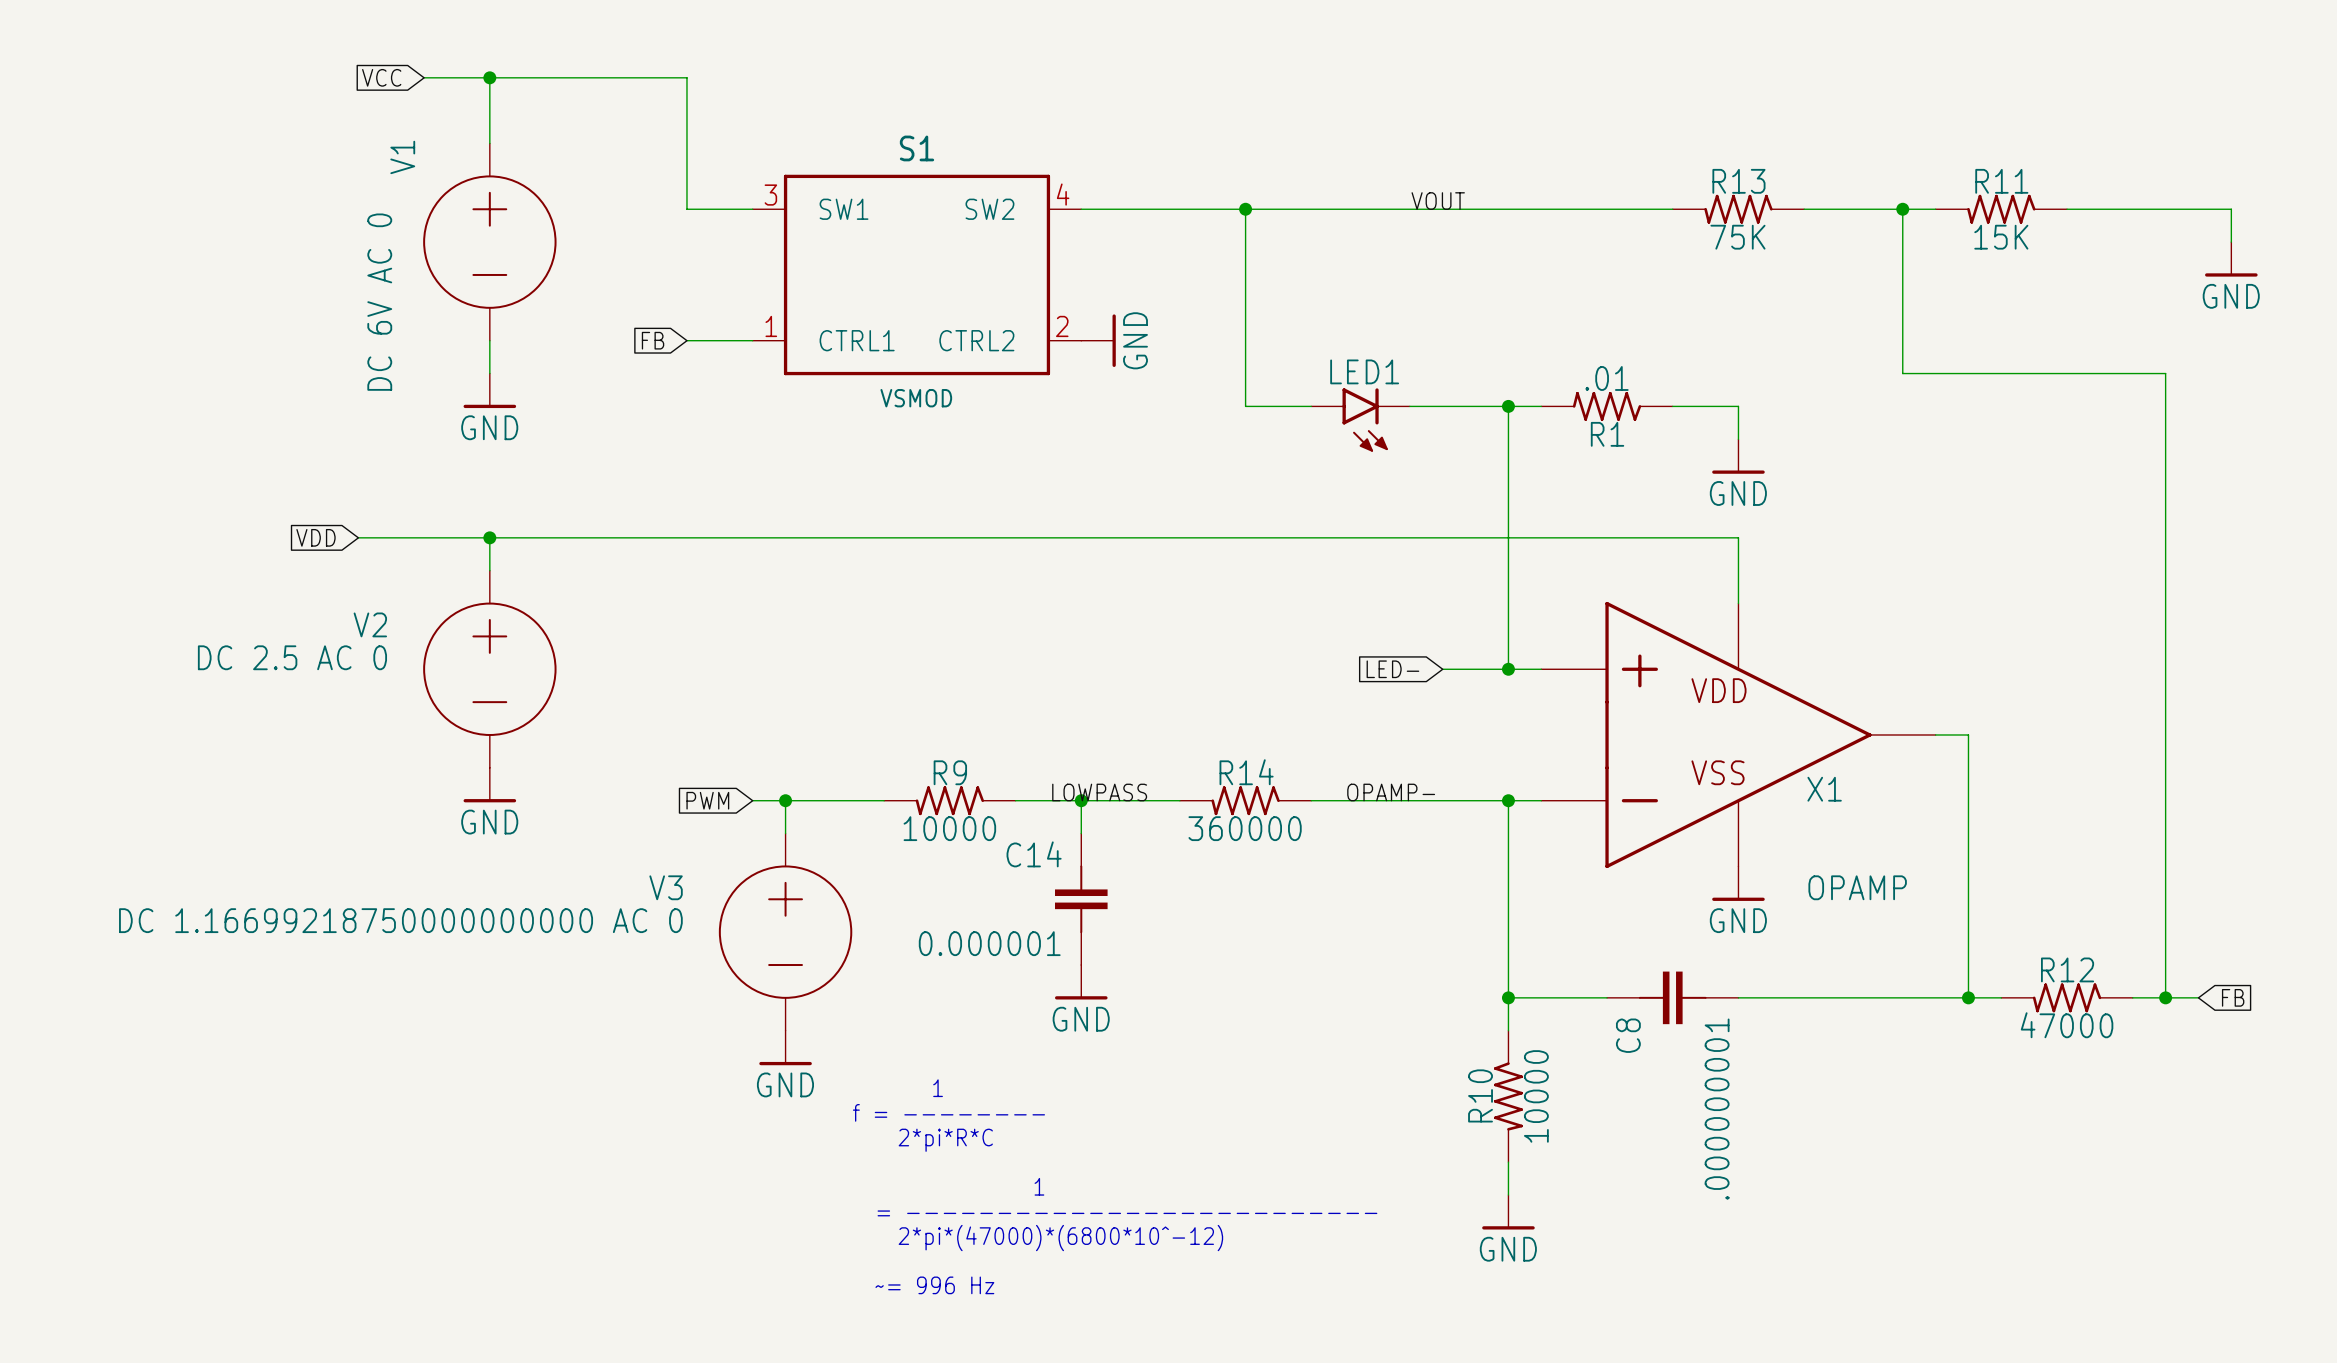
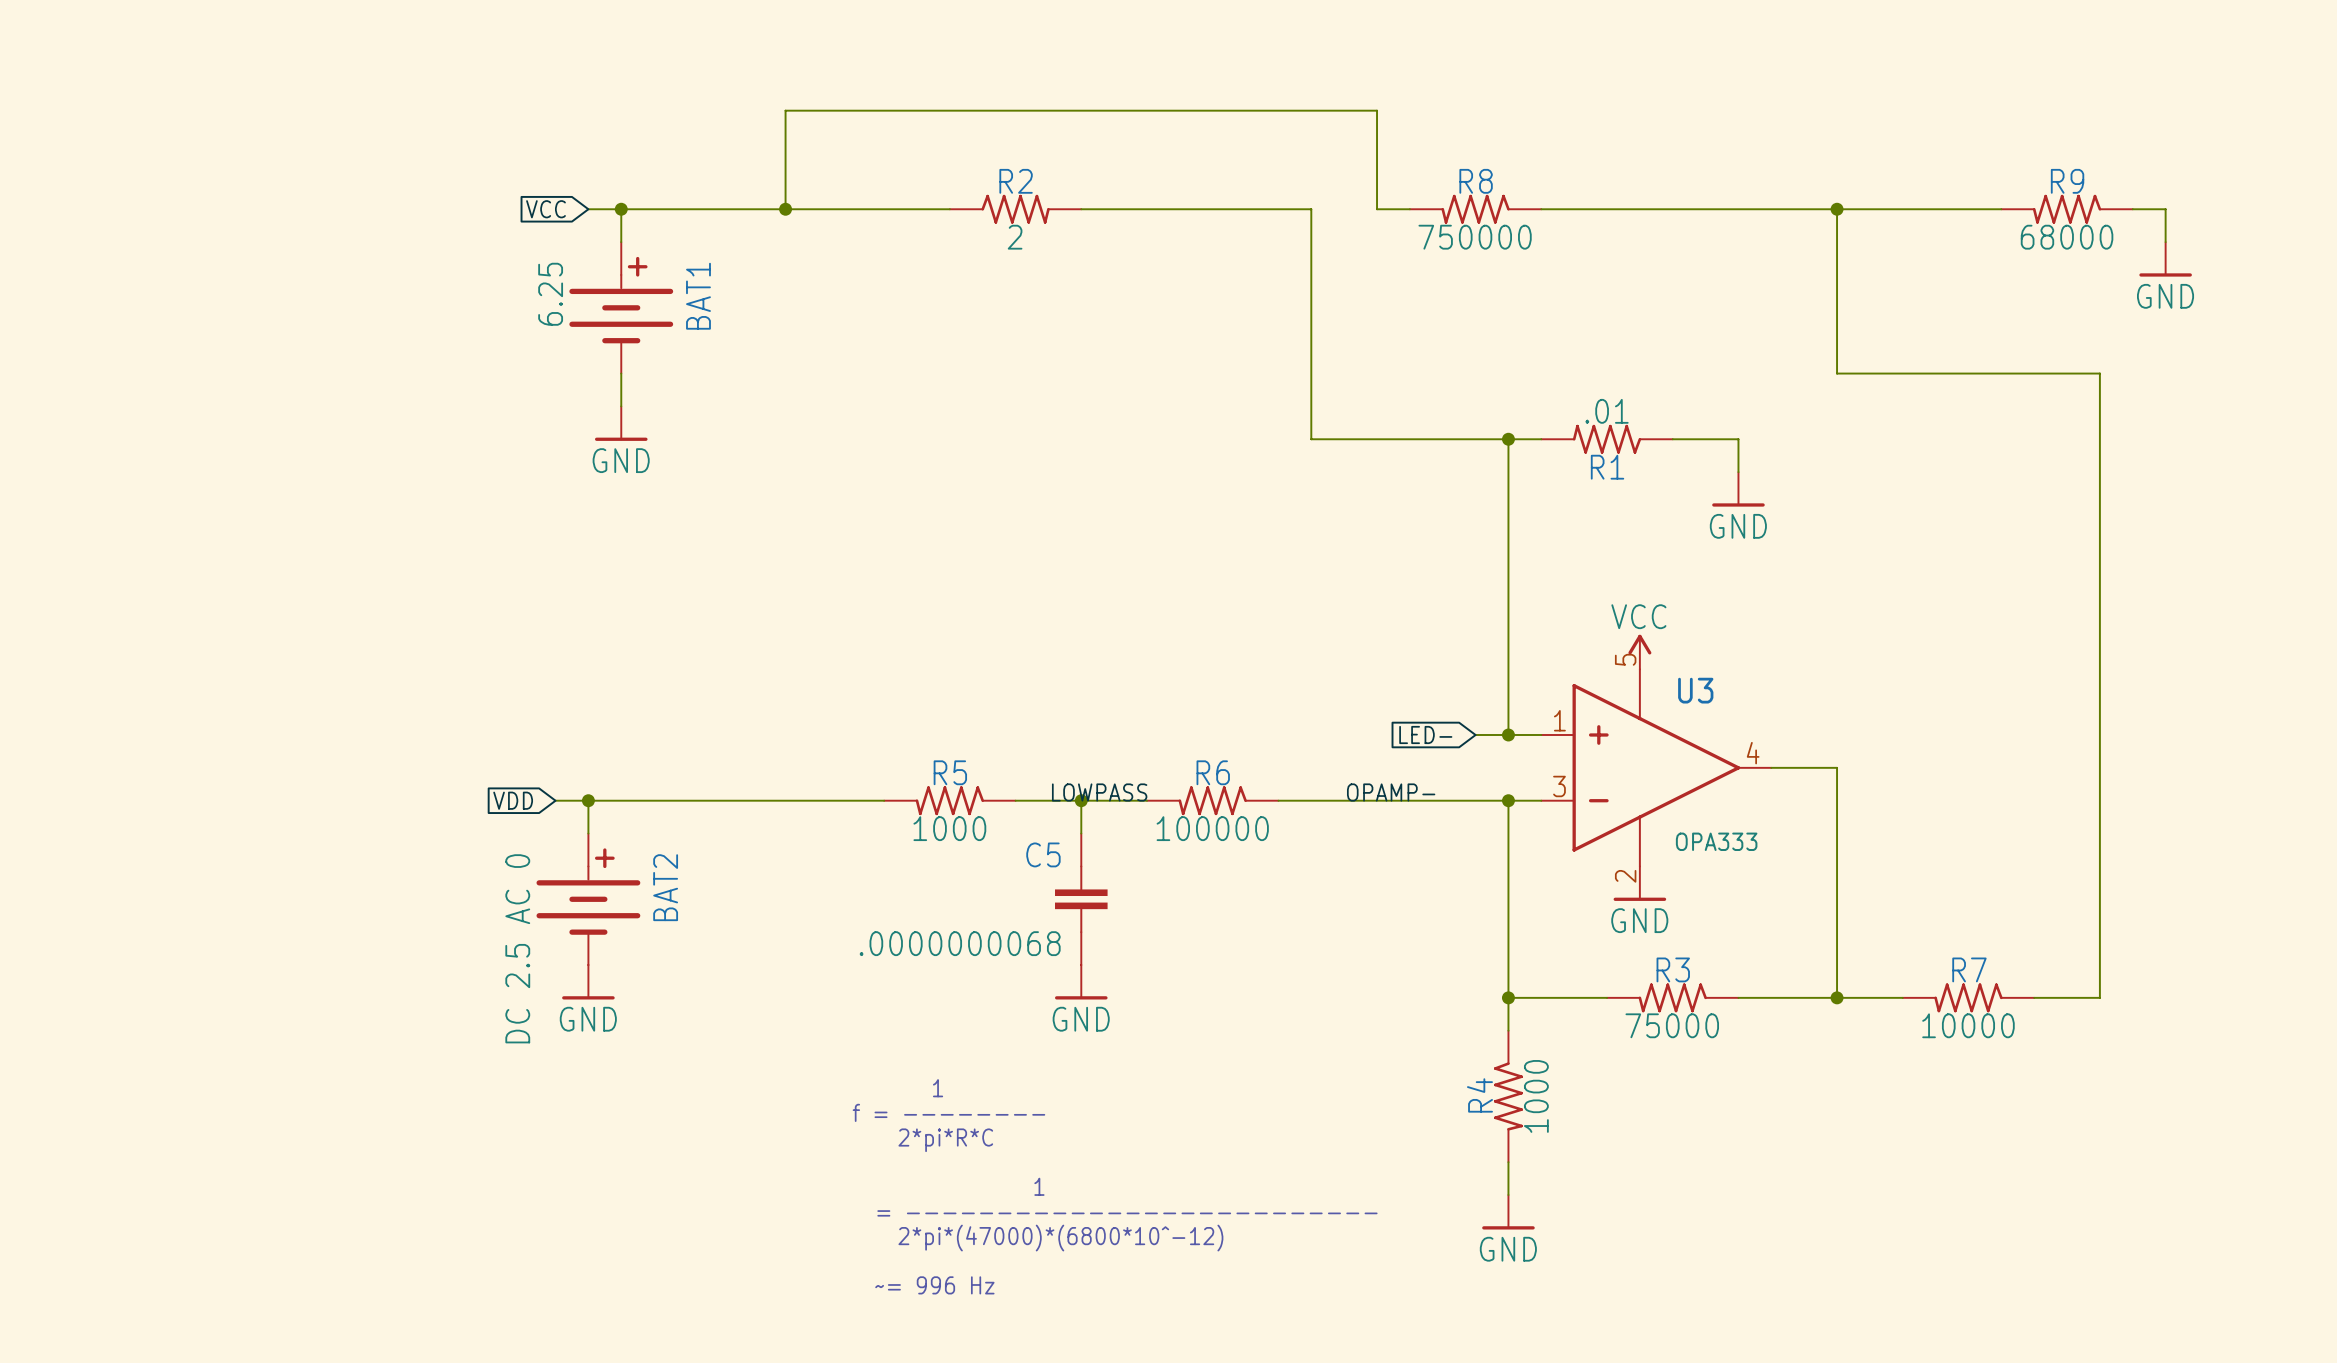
global label position: VCC (381, 77) -> VCC (546, 209)
wire: (424, 77) (686, 77) (686, 209) -> (588, 209) (686, 209)
wire: (489, 77) (489, 143) -> none
junction: (489, 77) -> none
label: VOUT (1438, 201) -> none
wire: none -> (621, 209) (621, 242)
junction: none -> (621, 209)
wire: none -> (752, 209) (949, 209)
wire: none -> (785, 209) (785, 110) (1377, 110) (1377, 209)
junction: none -> (785, 209)
R2: none -> 2 (1015, 209)
wire: (1245, 209) (1245, 406) (1311, 406) -> none
junction: (1245, 209) -> none
wire: (1311, 209) (1377, 209) -> (1311, 209) (1311, 439) (1541, 439)
R8: none -> 750000 (1475, 209)
R13: 75K (1738, 209) -> none
wire: (1902, 209) (1902, 373) -> (1837, 209) (1837, 373) (1902, 373)
junction position: (1902, 209) -> (1837, 209)
R11: 15K (2001, 209) -> none
R9: none -> 68000 (2067, 209)
wire: (2165, 209) (2231, 209) (2231, 242) -> (2165, 209) (2165, 242)
V1: DC 6V AC 0 (489, 242) -> none
power symbol position: GND (2231, 259) -> GND (2165, 259)
S1: VSMOD (917, 274) -> none
BAT1: none -> 6.25 (621, 307)
wire: (489, 340) (489, 373) -> (621, 373) (621, 406)
global label: FB (653, 340) -> none
wire: (686, 340) (752, 340) -> none
power symbol: GND (1098, 340) -> none
wire: (2099, 373) (2165, 373) (2165, 997) -> (2099, 373) (2099, 997) (2034, 997)
power symbol position: GND (489, 390) -> GND (621, 423)
wire: (1409, 406) (1541, 406) -> none
wire: (1508, 406) (1508, 439) -> none
junction position: (1508, 406) -> (1508, 439)
R1 position: (1607, 406) -> (1607, 439)
wire: (1672, 406) (1738, 406) (1738, 439) -> (1672, 439) (1738, 439) (1738, 472)
LED1: (1360, 420) -> none
power symbol position: GND (1738, 456) -> GND (1738, 489)
global label: VDD (315, 537) -> none
wire: (358, 537) (1738, 537) (1738, 603) -> none
wire: (489, 537) (489, 570) -> none
junction: (489, 537) -> none
power symbol: none -> VCC (1639, 652)
V2: DC 2.5 AC 0 (489, 669) -> none
global label position: LED- (1392, 669) -> LED- (1425, 734)
wire: (1442, 669) (1541, 669) -> none
wire: none -> (1508, 669) (1508, 734)
junction position: (1508, 669) -> (1508, 734)
wire: none -> (1475, 734) (1541, 734)
X1: OPAMP (1738, 734) -> none
wire: (1935, 734) (1968, 734) (1968, 997) -> none
U3: none -> OPA333 (1656, 767)
wire: none -> (1771, 767) (1837, 767) (1837, 997)
R9 name: R9 (950, 772) -> R5 (950, 772)
power symbol: GND (489, 785) -> none
global label: none -> VDD (513, 800)
wire: none -> (555, 800) (752, 800)
junction: none -> (588, 800)
global label: PWM (707, 800) -> none
wire: (785, 800) (785, 833) -> (588, 800) (588, 833)
junction: (785, 800) -> none
R6: none -> 100000 (1212, 800)
R14: 360000 (1245, 800) -> none
R9 value: 10000 (949, 828) -> 1000 (949, 828)
C14 name: C14 (1034, 854) -> C5 (1043, 854)
power symbol position: GND (1738, 883) -> GND (1639, 883)
BAT2: none -> DC 2.5 AC 0 (588, 899)
V3: DC 1.16699218750000000000 AC 0 (785, 932) -> none
C14 value: 0.000001 (989, 943) -> .0000000068 (960, 943)
power symbol: none -> GND (588, 982)
C8: .000000001 (1672, 997) -> none
R3: none -> 75000 (1672, 997)
junction: none -> (1837, 997)
R7: none -> 10000 (1968, 997)
junction: (1968, 997) -> none
R12: 47000 (2067, 997) -> none
wire: (2132, 997) (2198, 997) -> none
junction: (2165, 997) -> none
global label: FB (2233, 997) -> none
power symbol: GND (785, 1047) -> none
R10 name: R10 (1480, 1095) -> R4 (1479, 1095)
R10 value: 10000 (1536, 1096) -> 1000 (1536, 1096)

